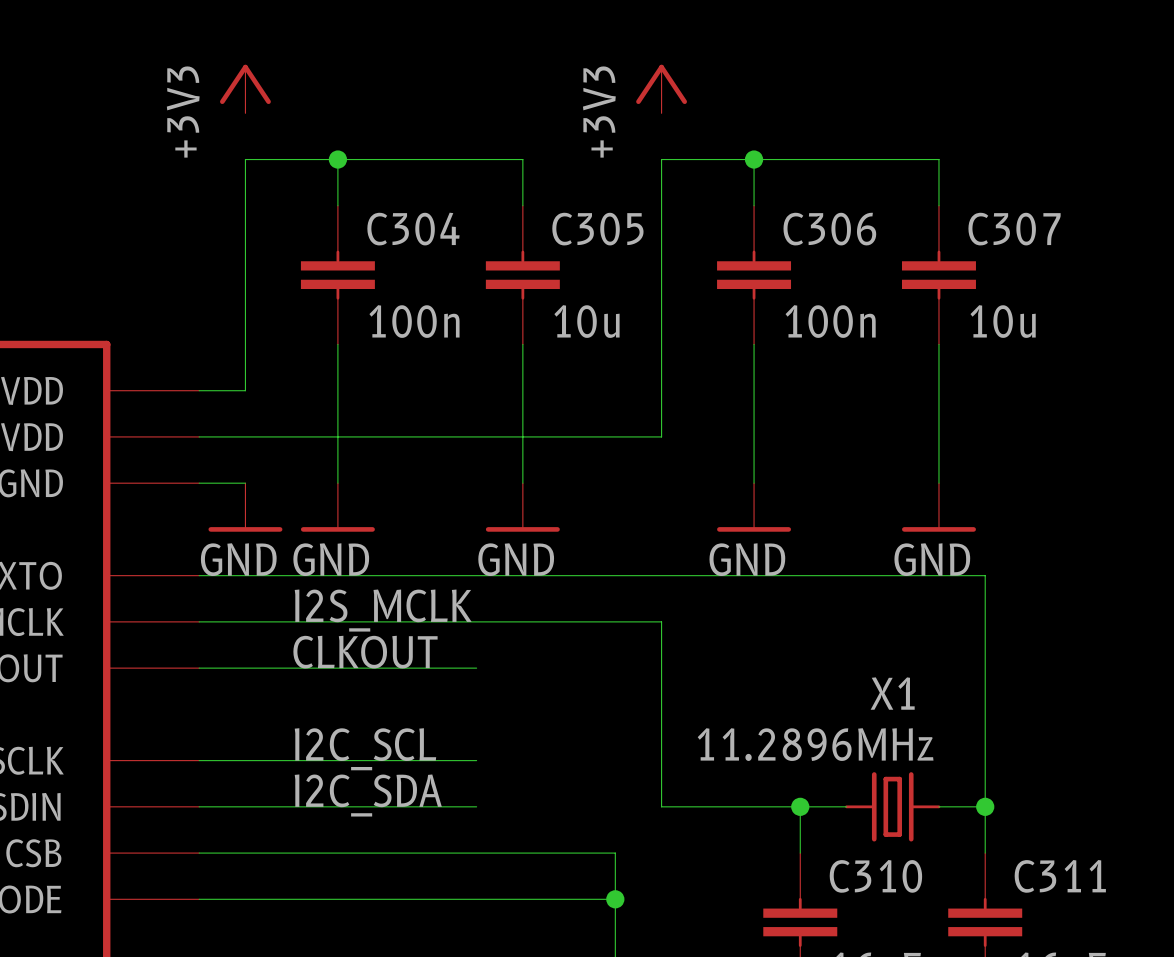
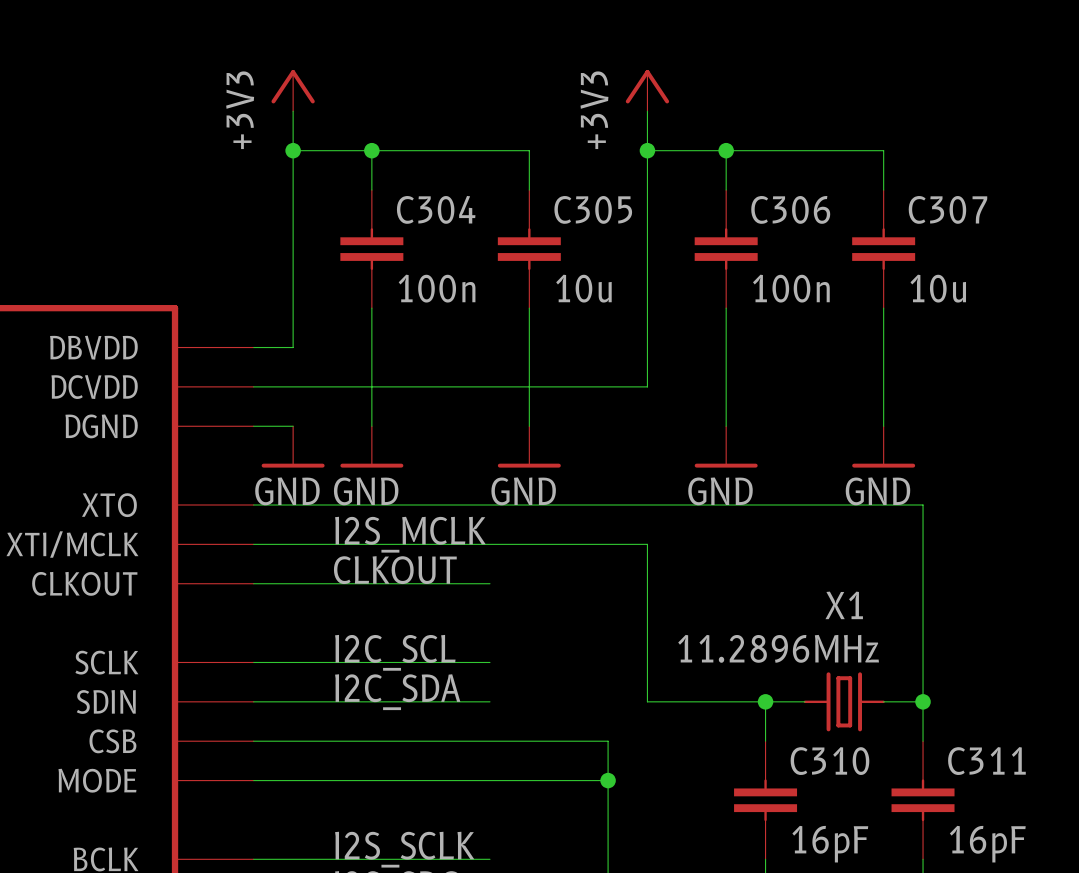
wire: none -> (293, 111) (293, 150)
wire: none -> (647, 111) (647, 150)
junction: none -> (293, 150)
junction: none -> (647, 150)

